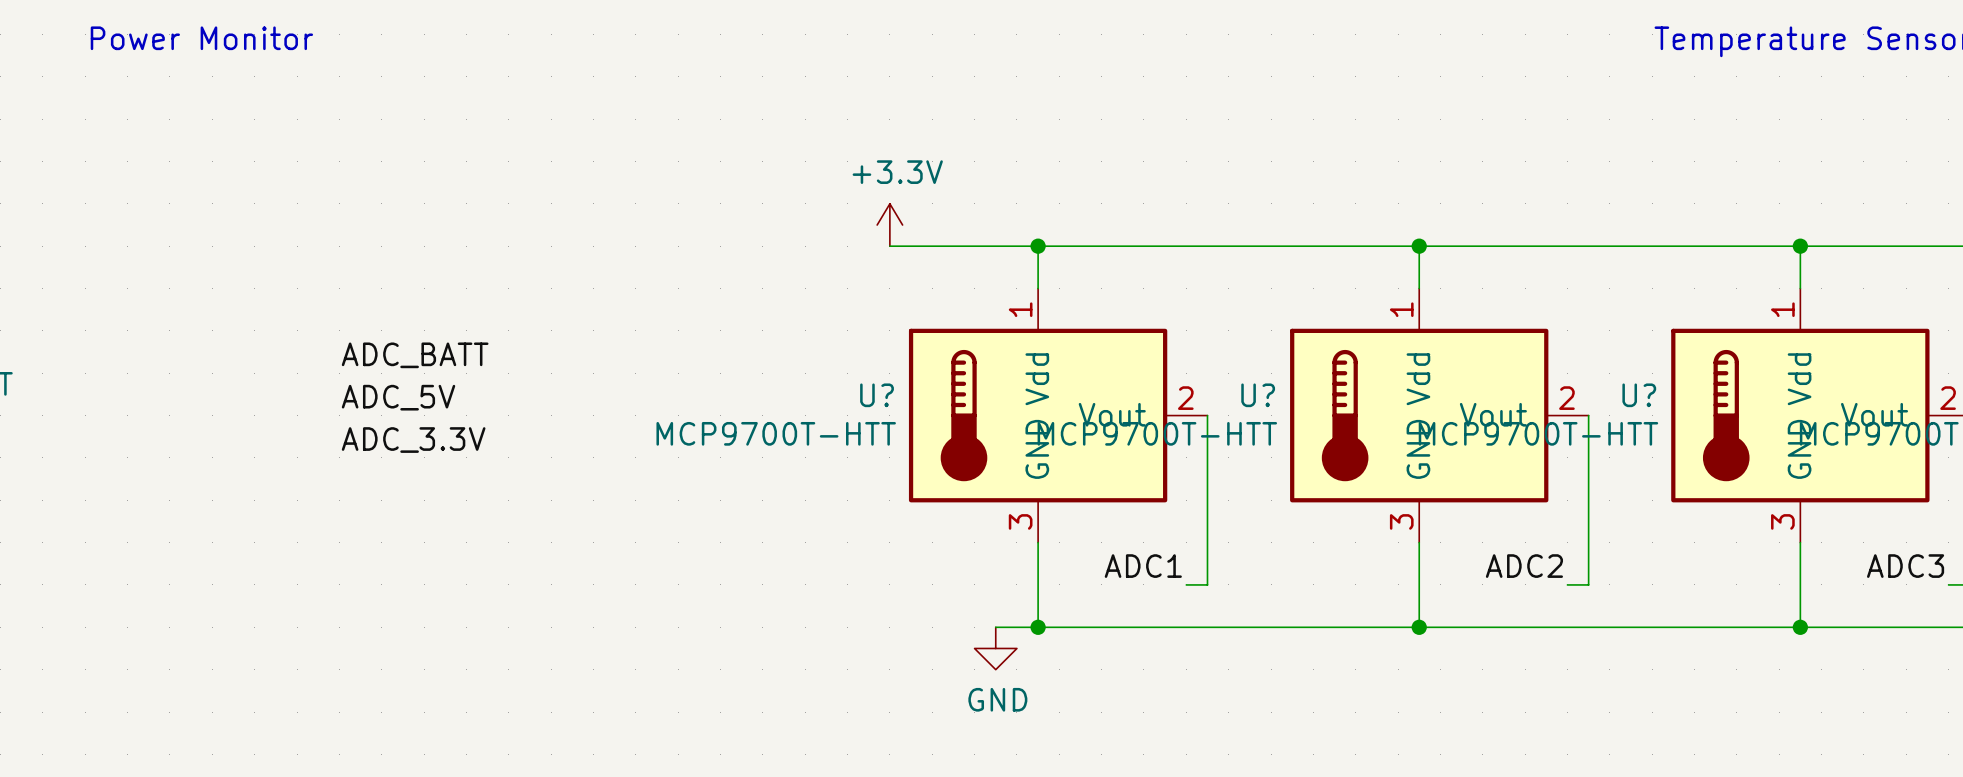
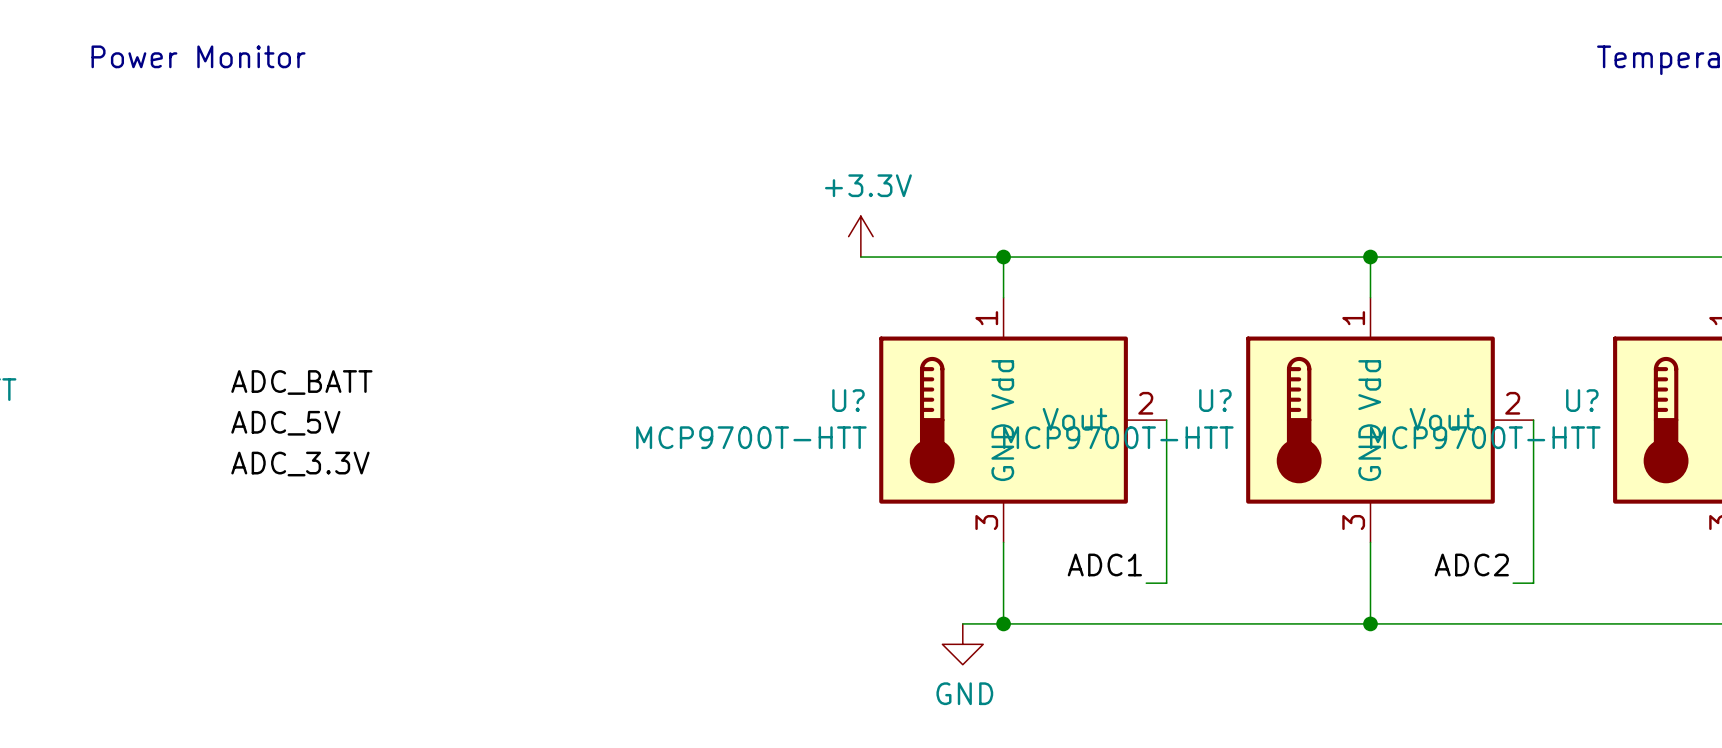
label position: ADC_BATT (415, 355) -> ADC_BATT (301, 382)
label position: ADC_5V (398, 397) -> ADC_5V (285, 423)
label position: ADC_3.3V (413, 440) -> ADC_3.3V (300, 464)

